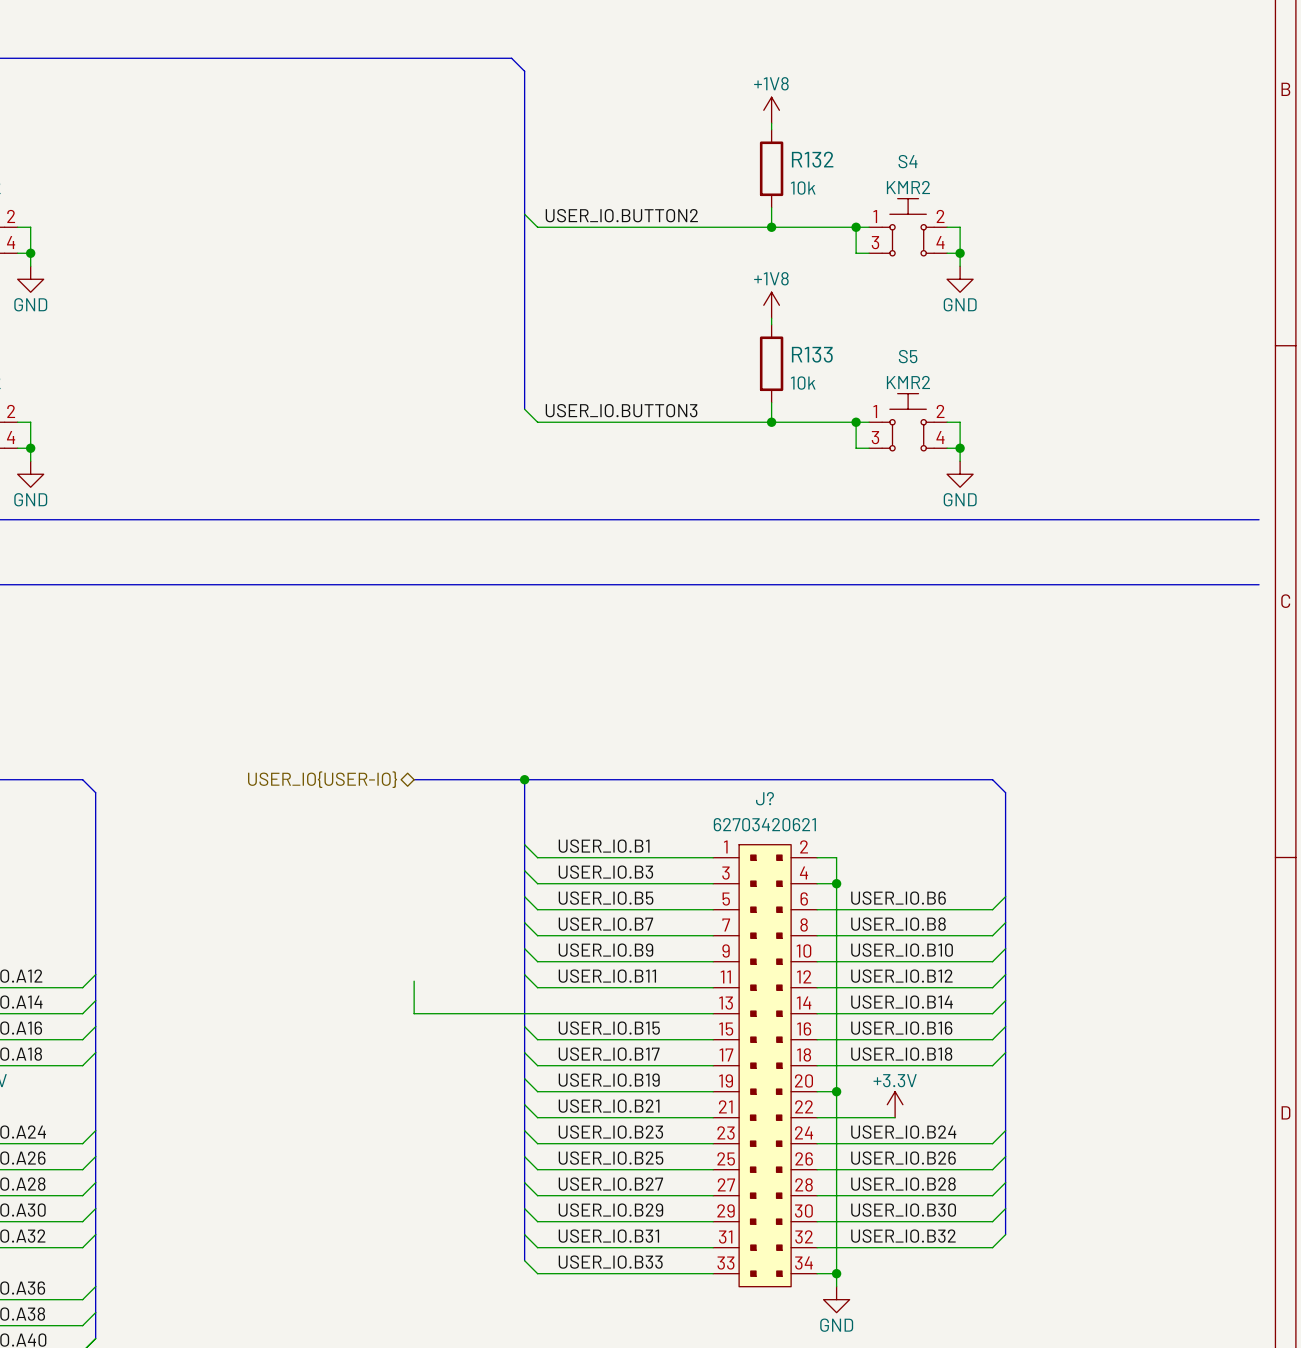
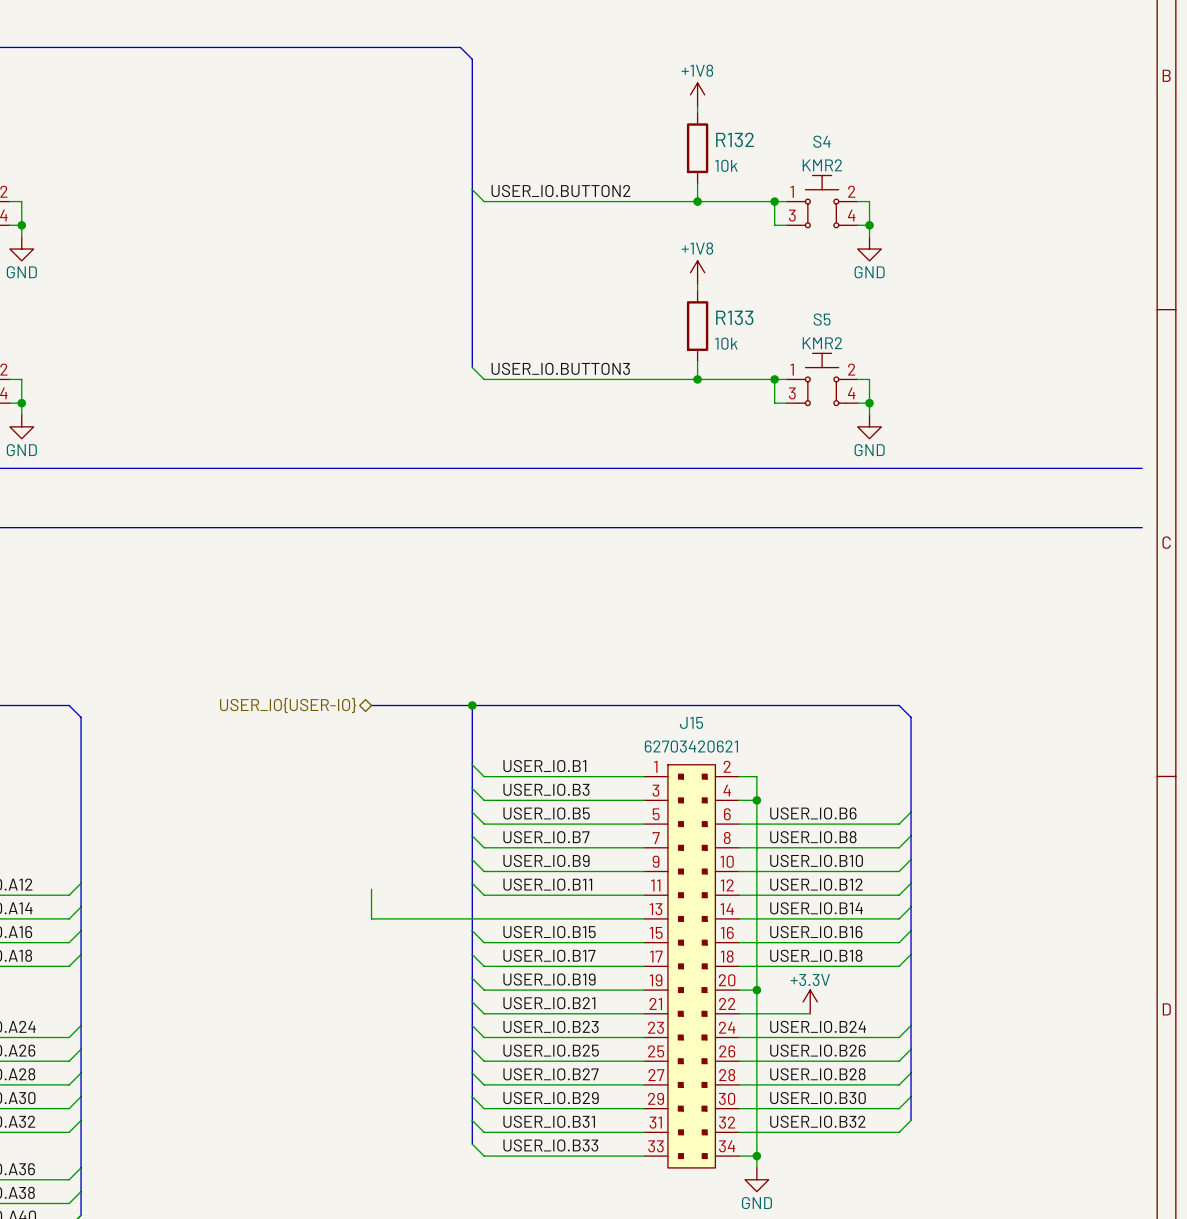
J? name: J? (764, 798) -> J15 (691, 722)

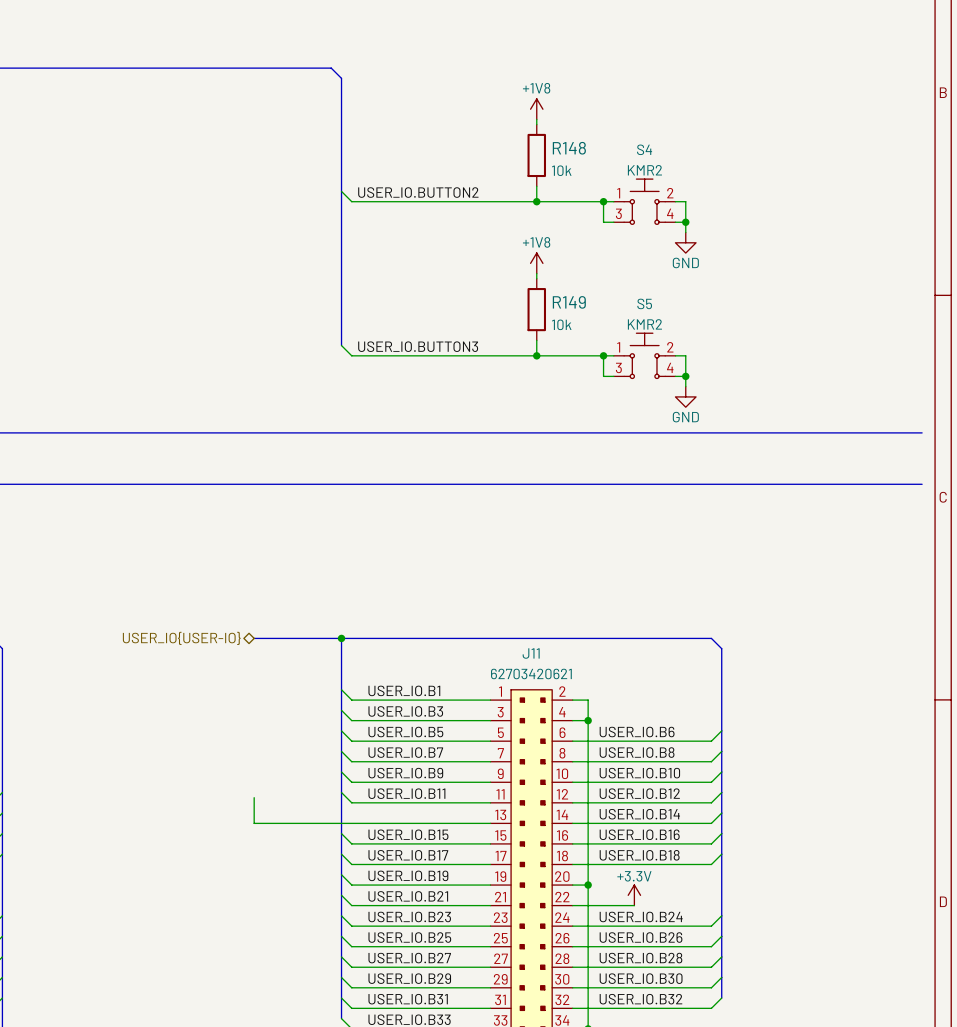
R132 name: R132 (735, 139) -> R148 (569, 148)
R133 name: R133 (734, 317) -> R149 (569, 302)
J15 name: J15 (691, 722) -> J11 (531, 653)

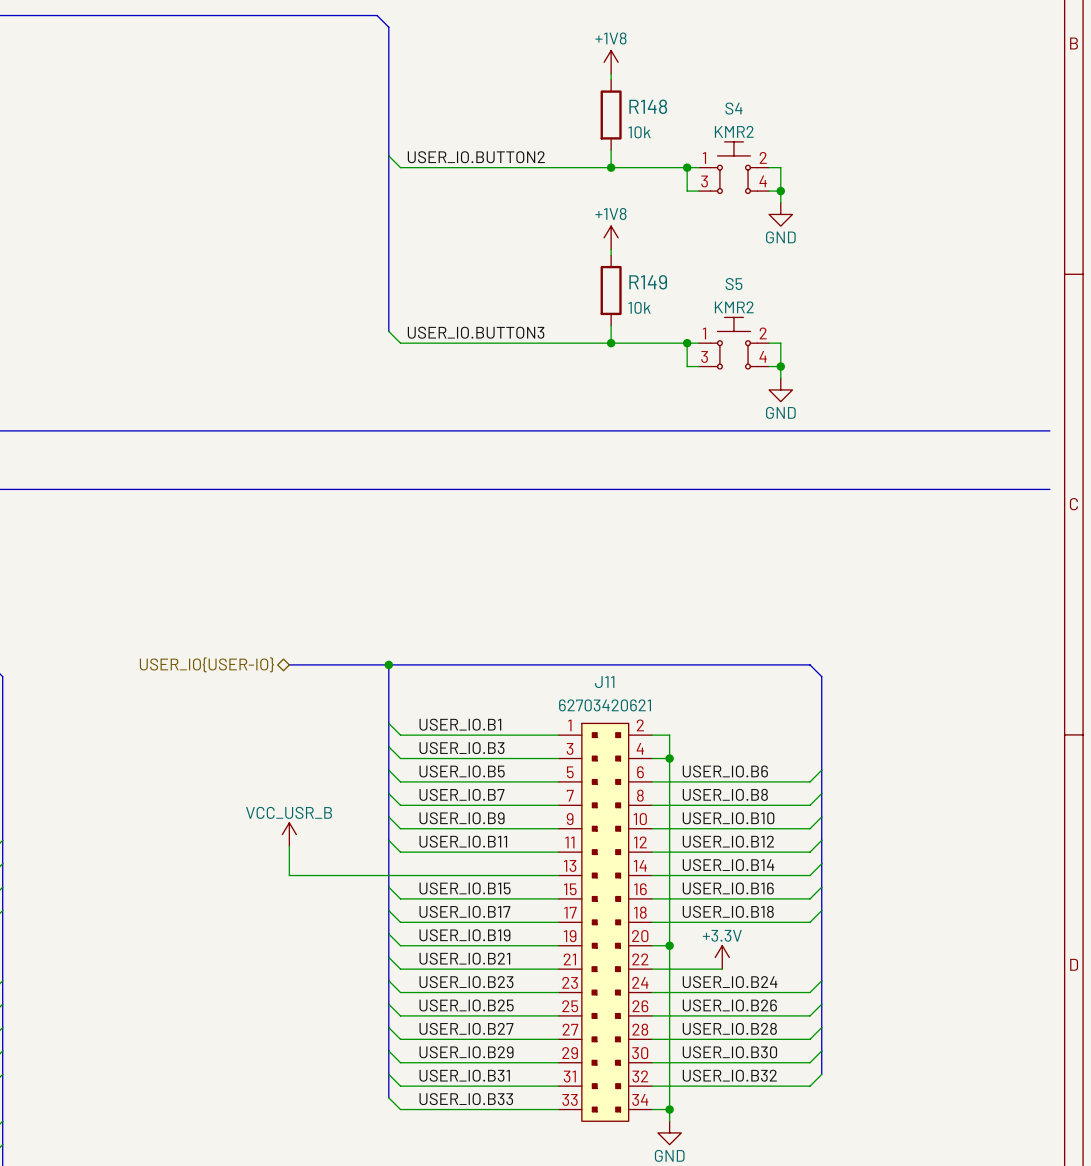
power symbol: none -> VCC_USR_B (289, 834)

